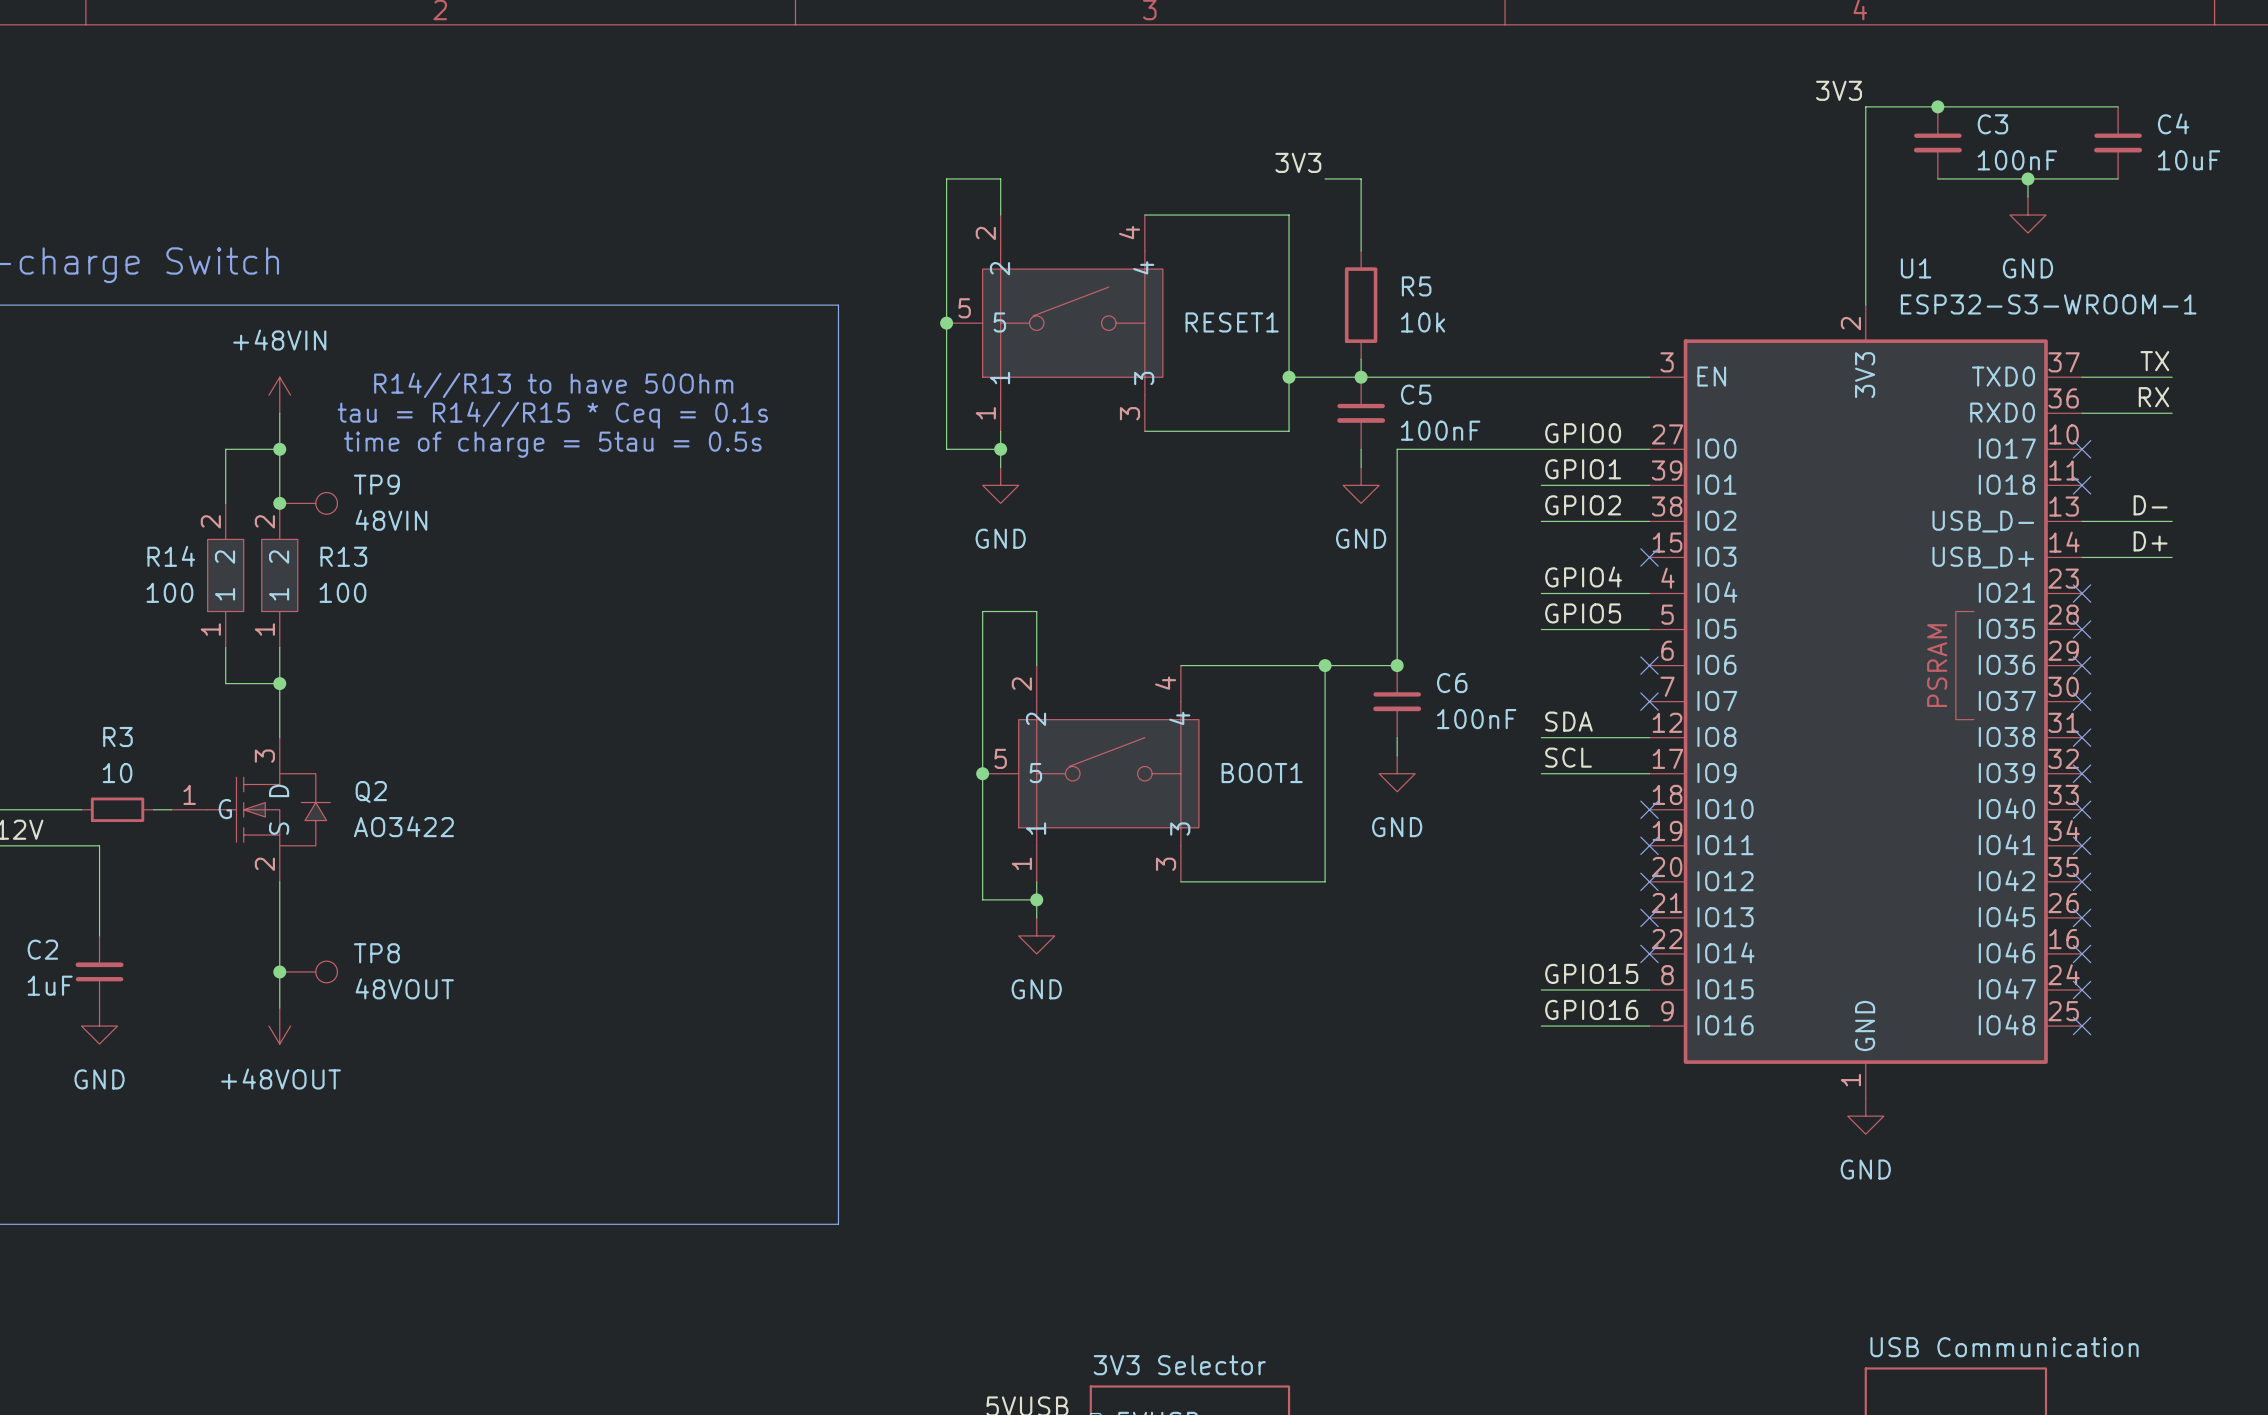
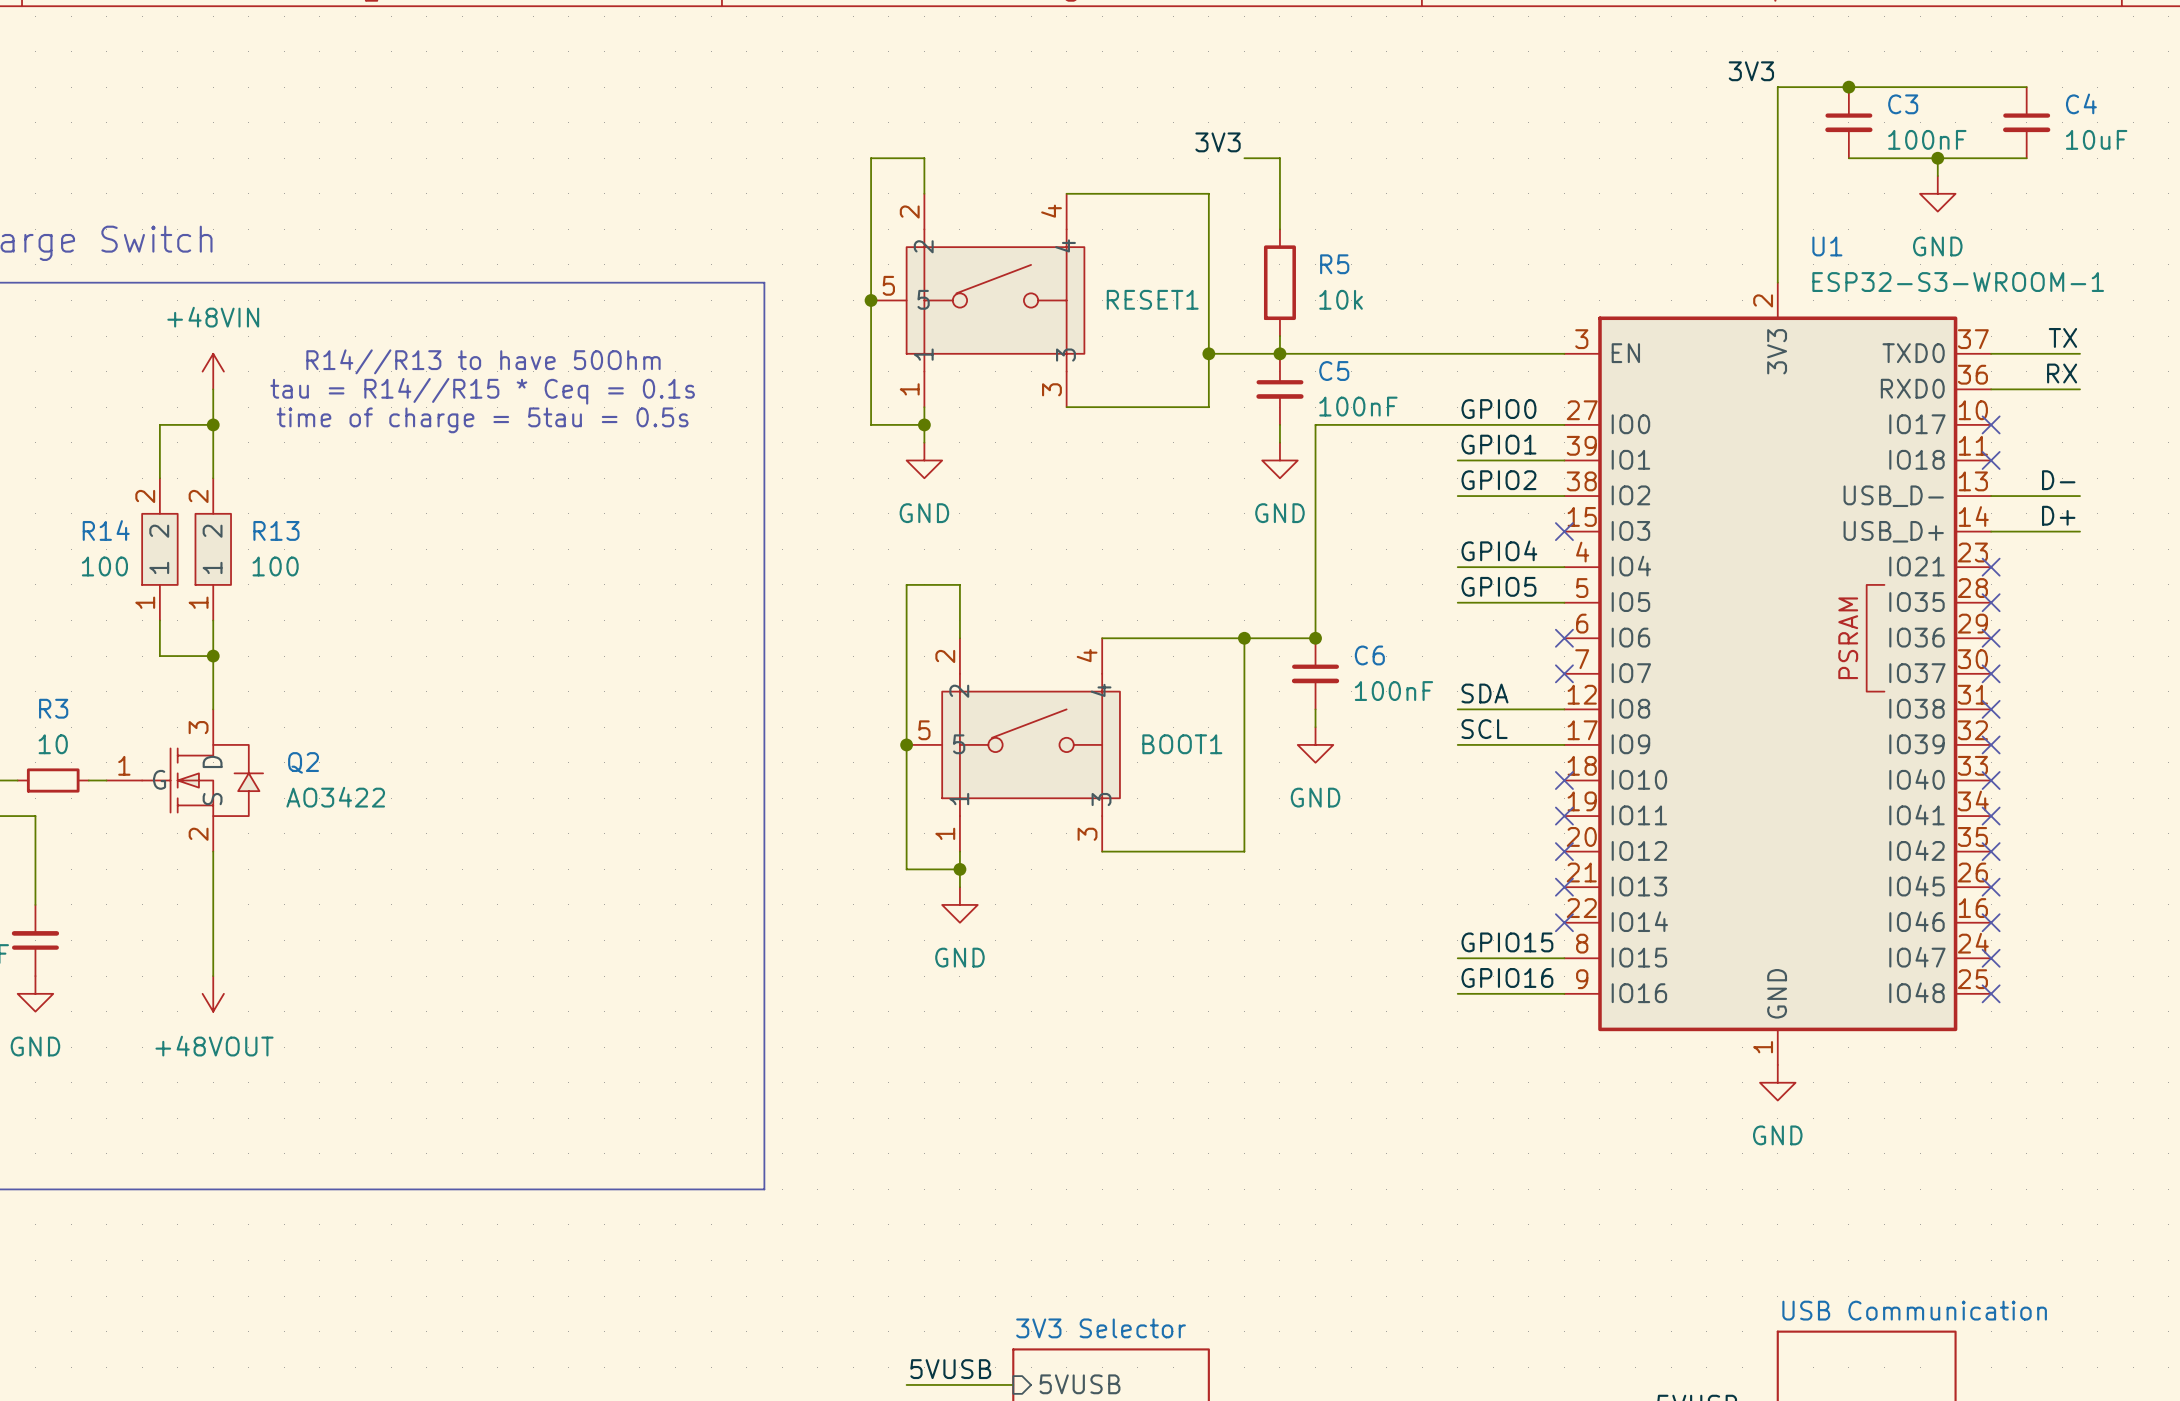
junction: (279, 503) -> none
TP9: 48VIN (308, 503) -> none
junction: (279, 971) -> none
TP8: 48VOUT (308, 971) -> none

